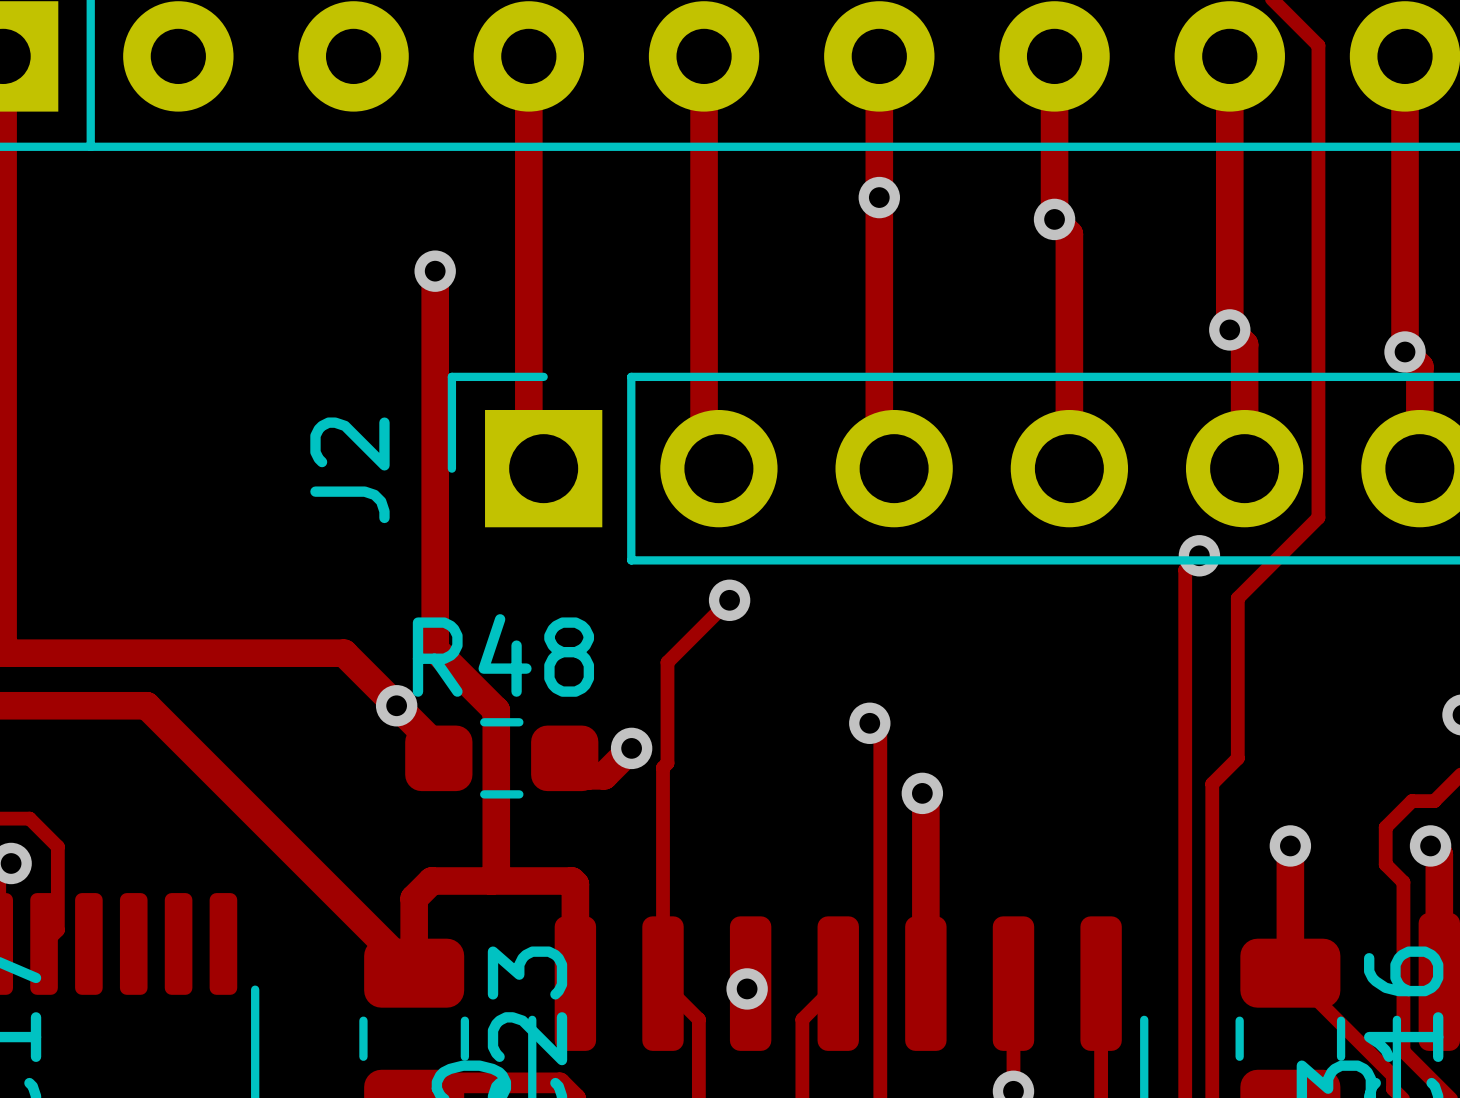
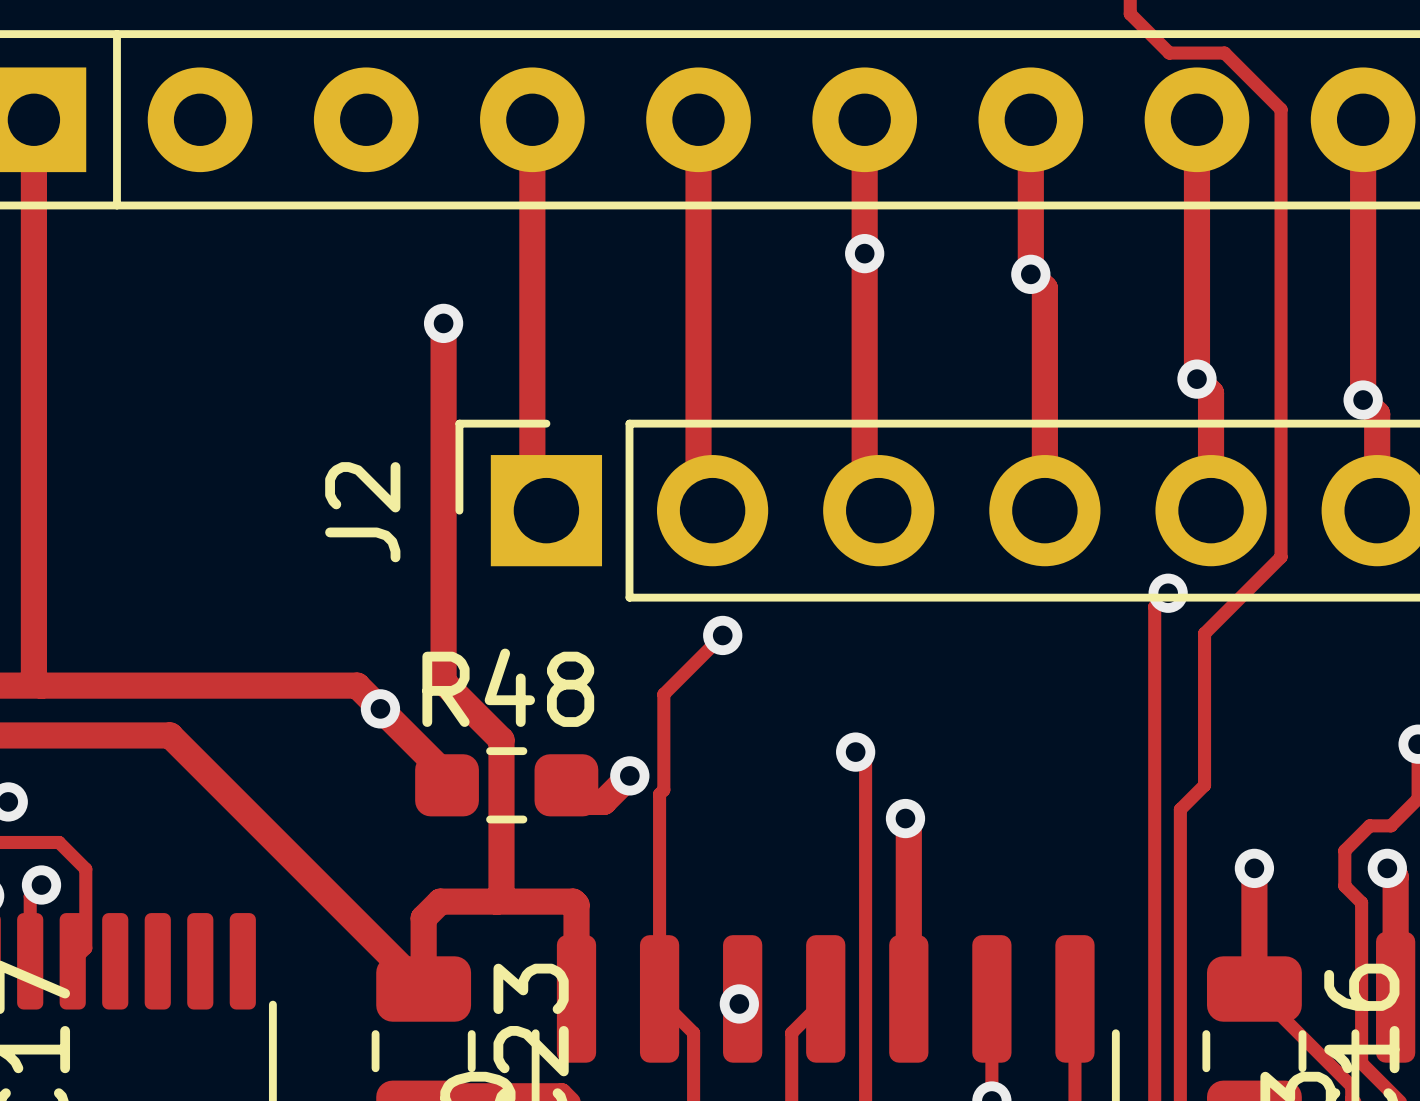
via position: (396, 705) -> (380, 708)

